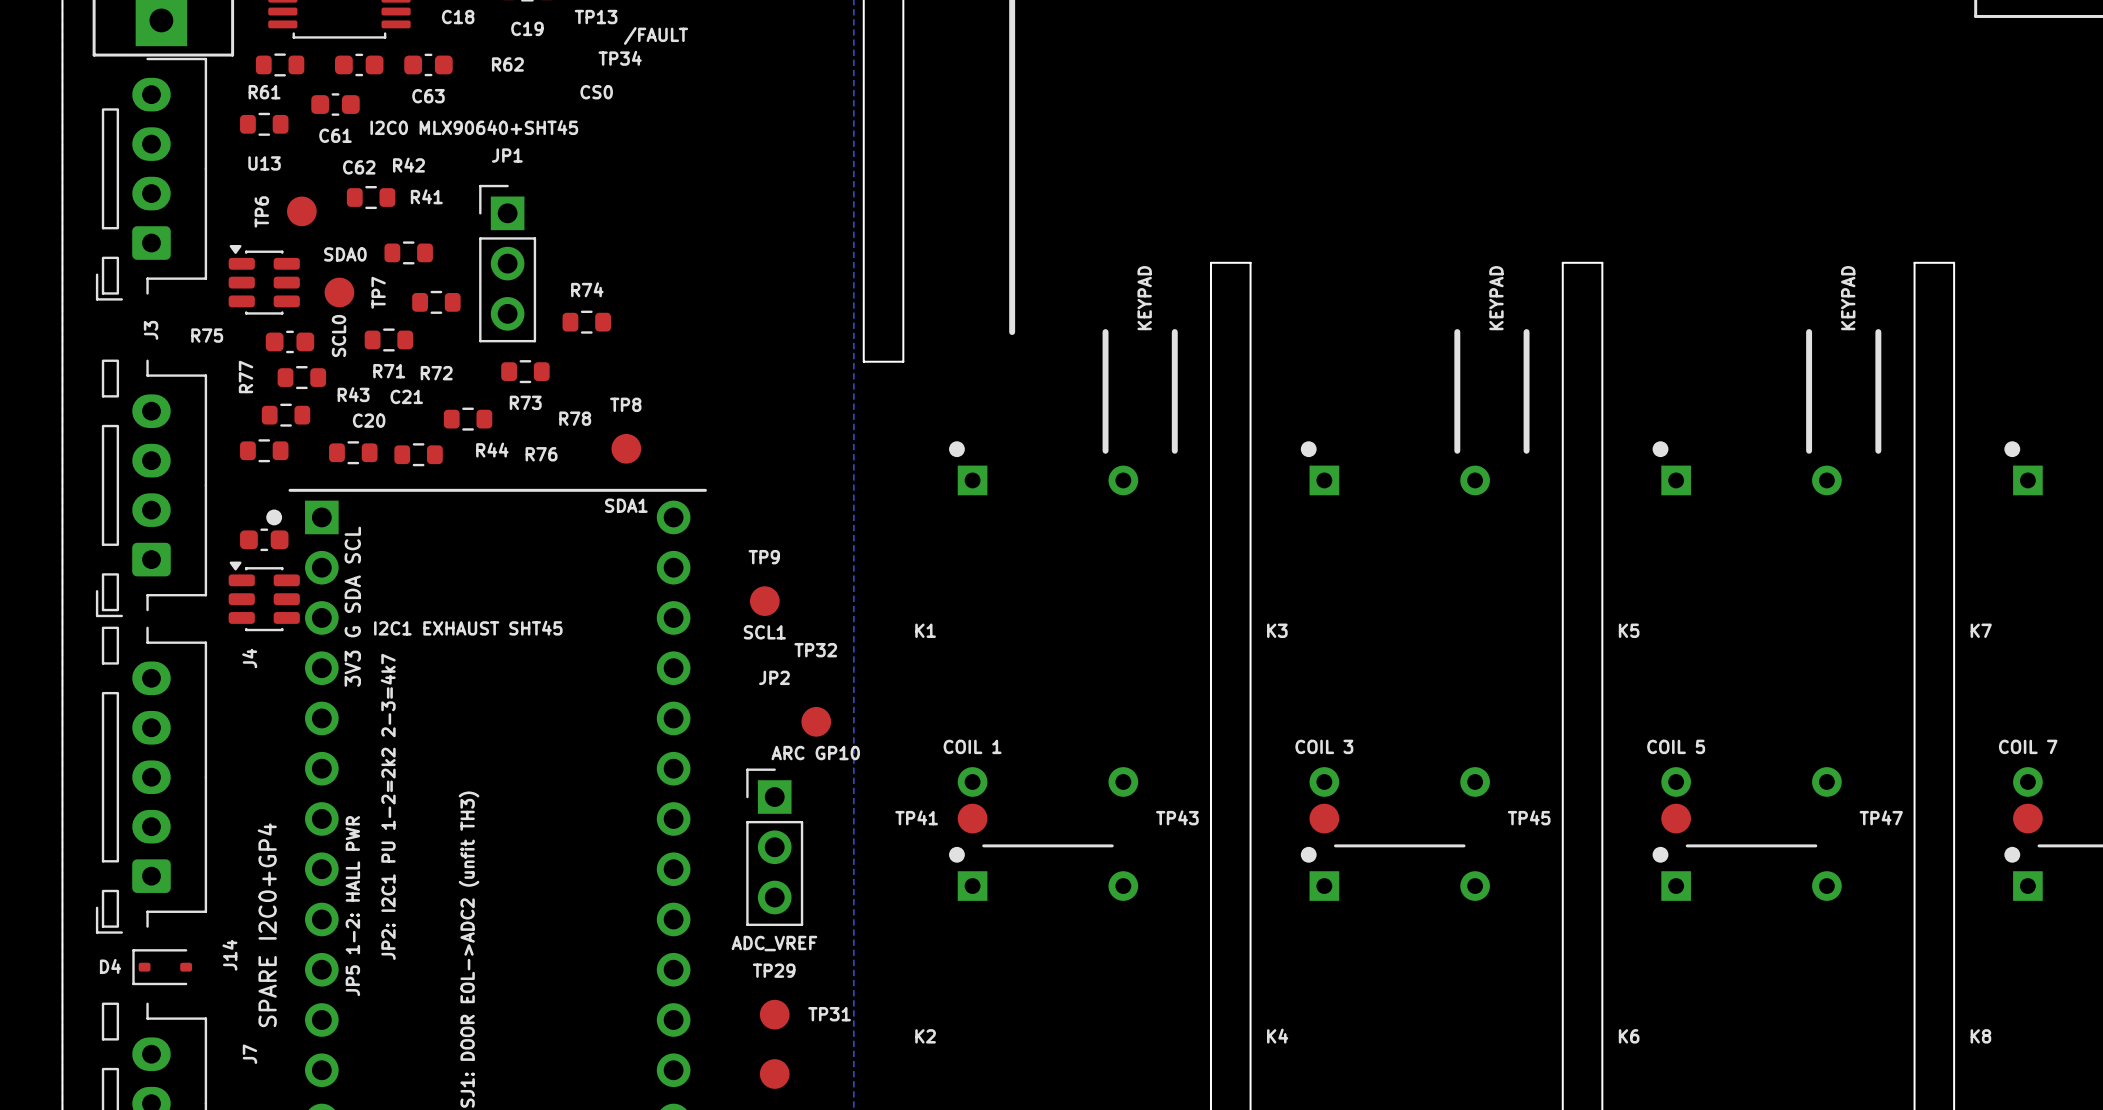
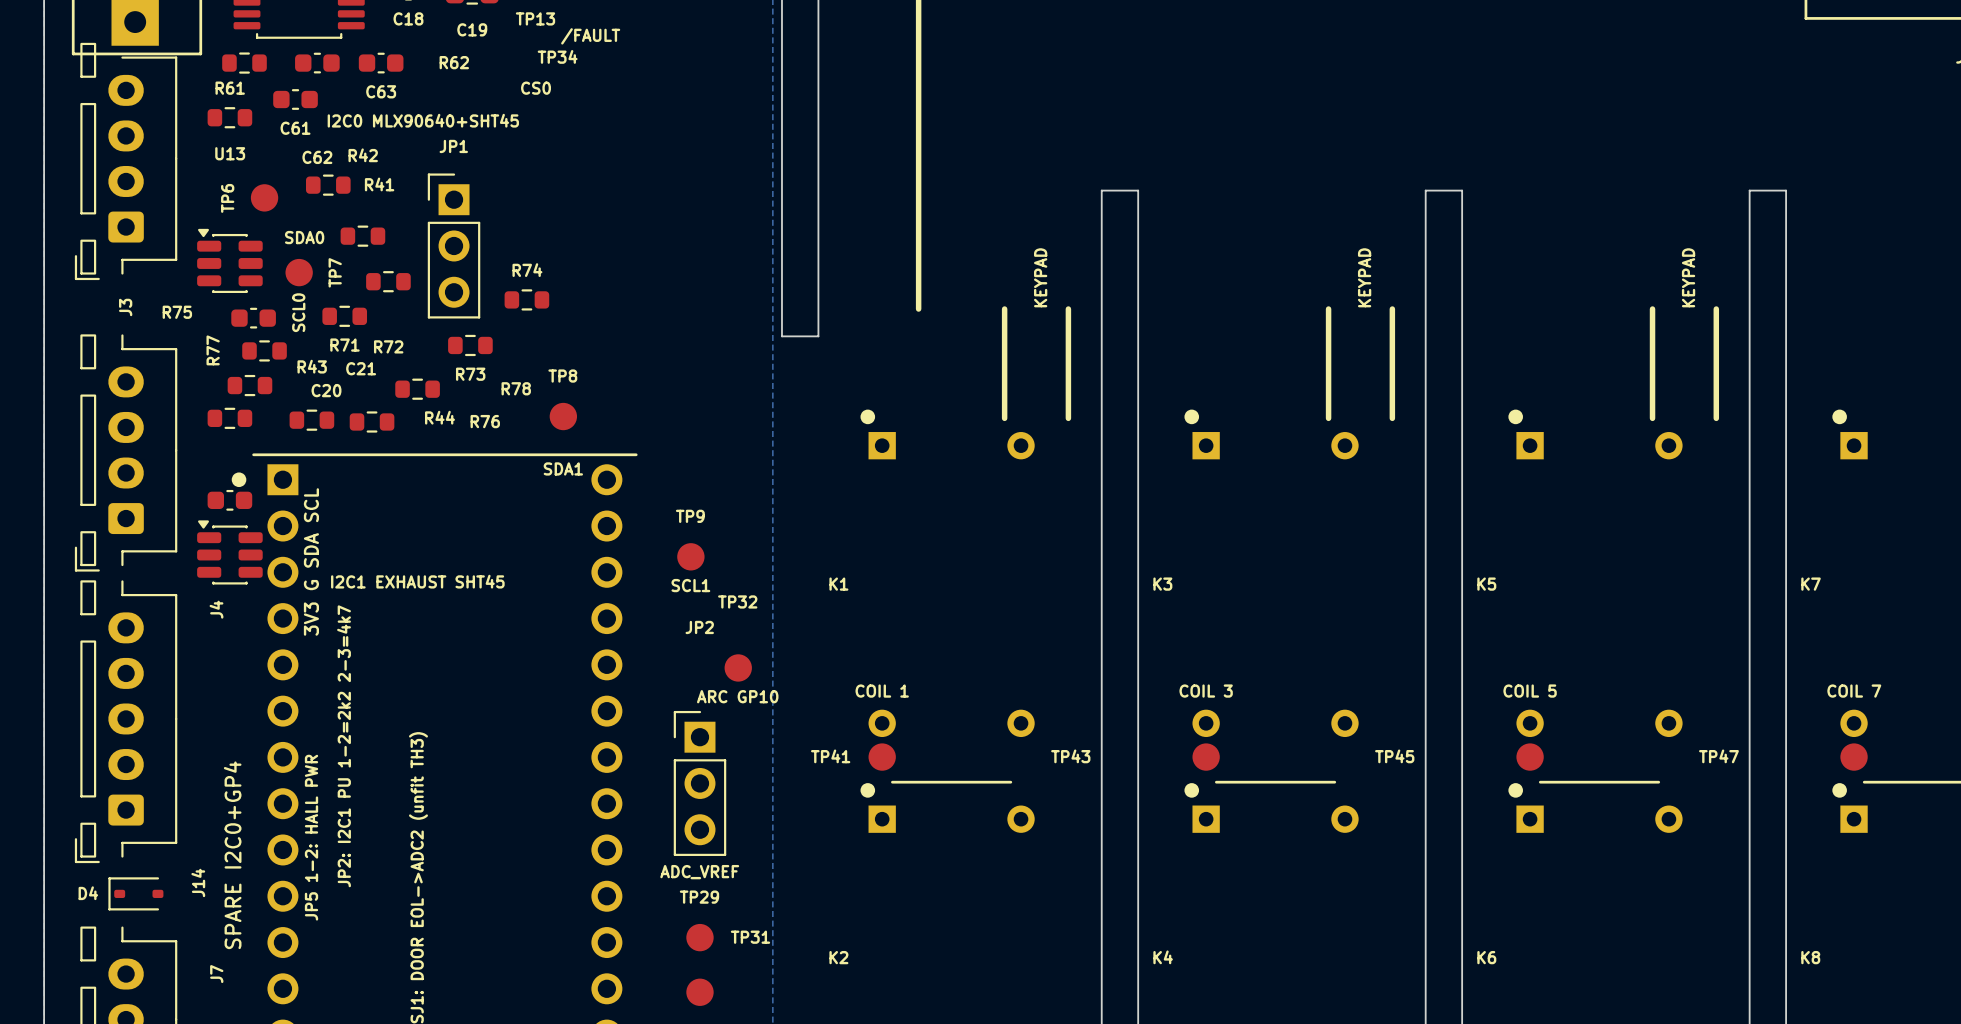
J3 footprint: [95, 57, 208, 301] -> [74, 42, 178, 281]
board edge: (1210, 262) (1250, 262) -> (1101, 245) (1101, 190) (1138, 190) (1138, 245)
board edge: (1562, 262) (1602, 262) -> (1425, 245) (1425, 190) (1462, 190) (1462, 245)
board edge: (1914, 262) (1954, 262) -> (1749, 245) (1749, 190) (1786, 190) (1786, 245)

